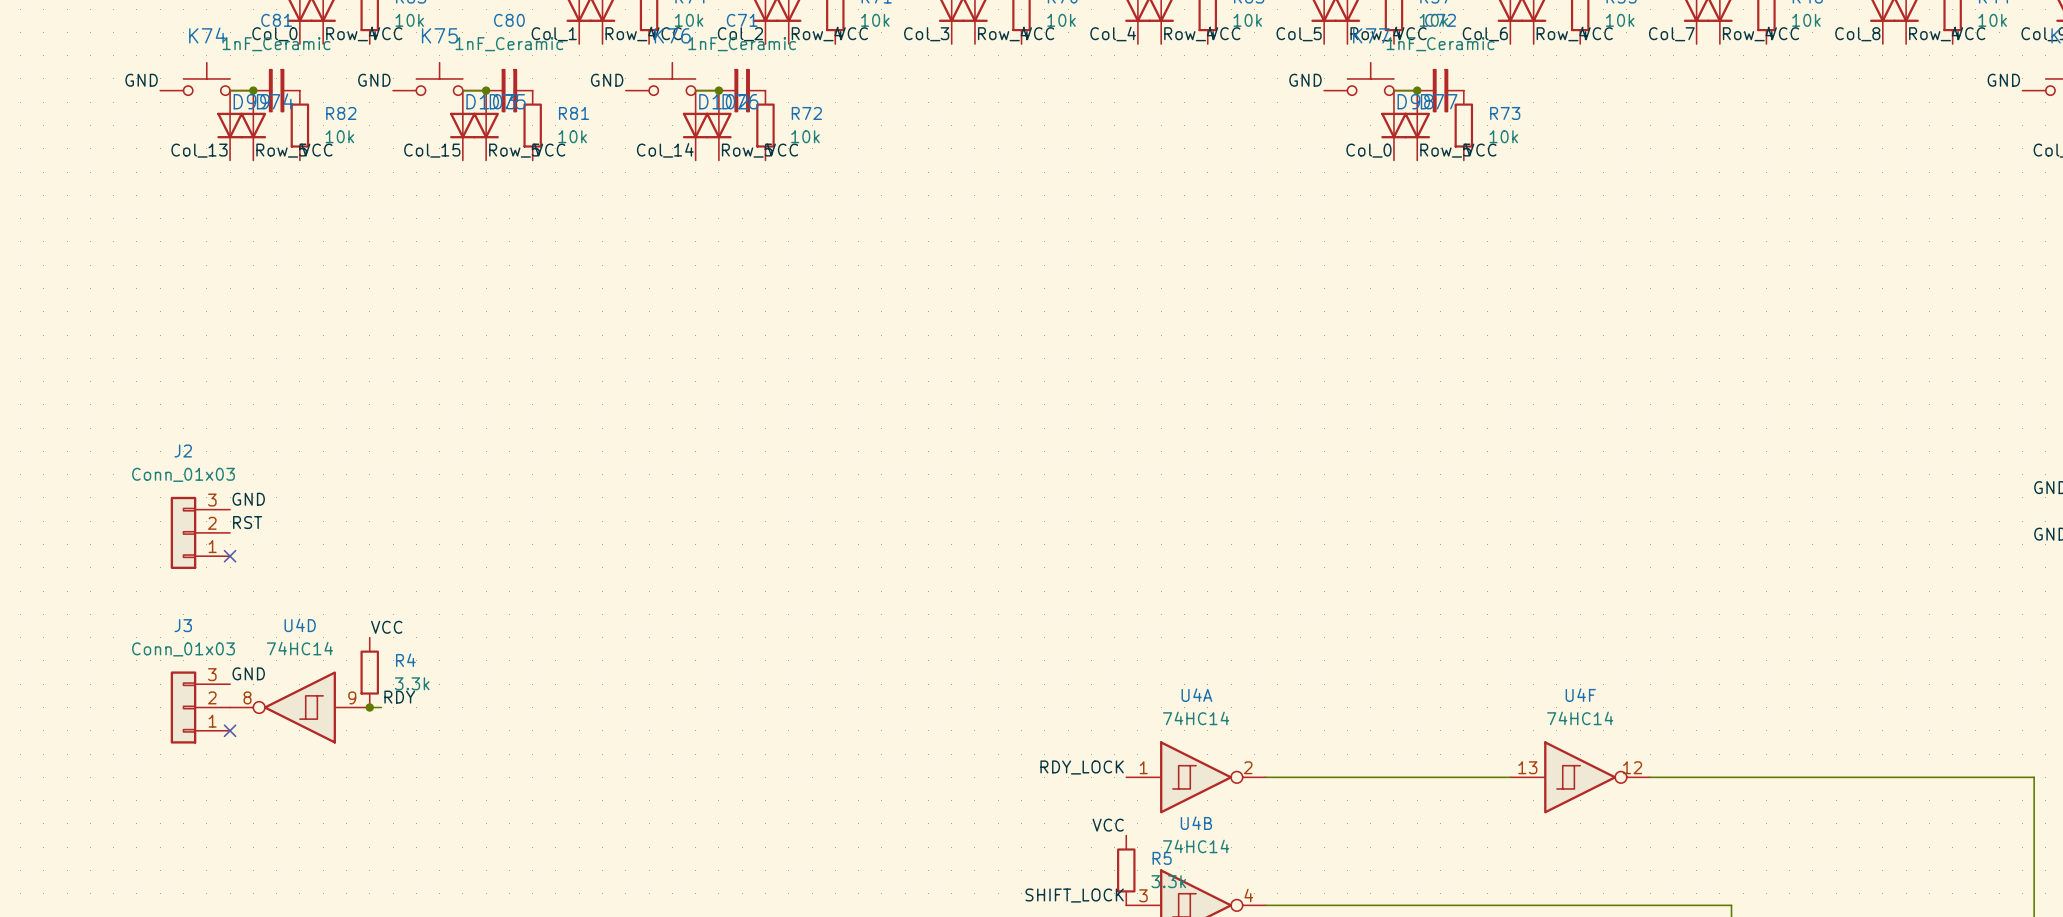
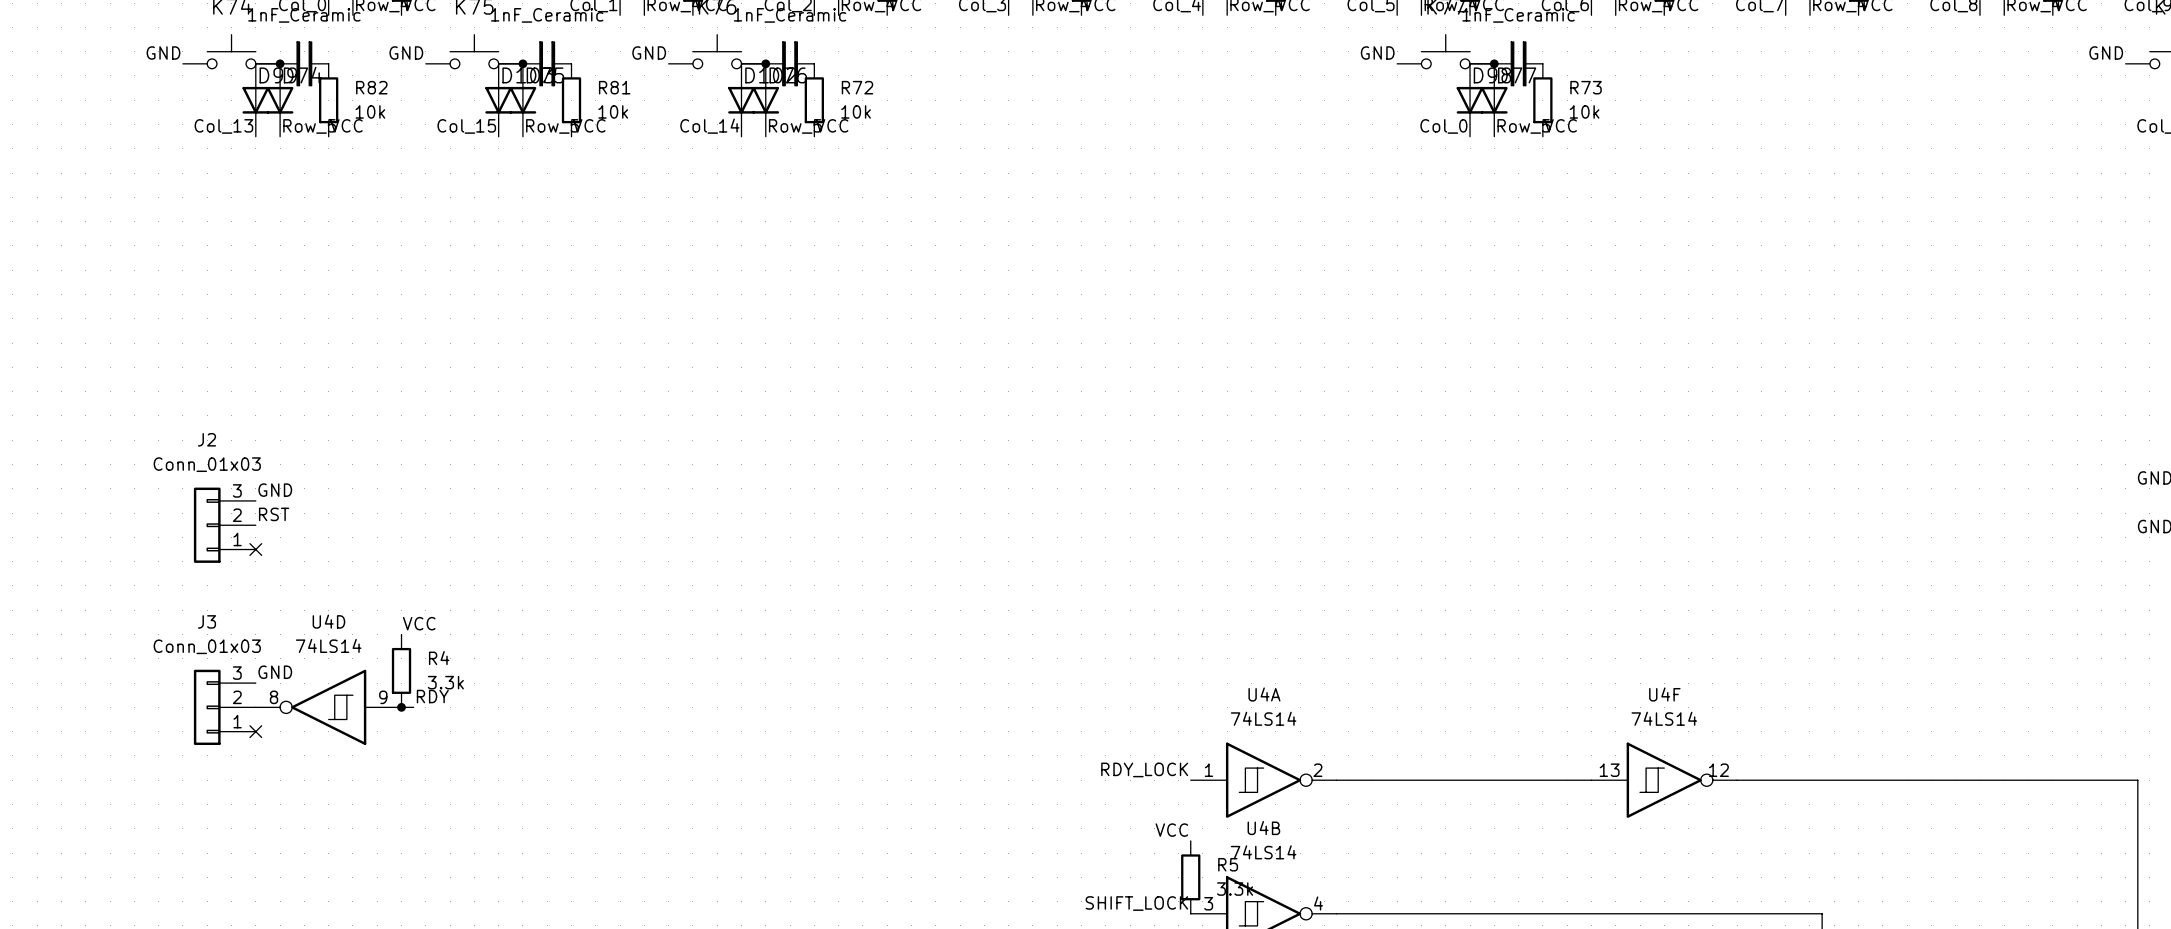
U4D value: 74HC14 (299, 648) -> 74LS14 (328, 645)
U4A value: 74HC14 (1196, 718) -> 74LS14 (1263, 718)
U4F value: 74HC14 (1580, 718) -> 74LS14 (1664, 718)
U4B value: 74HC14 (1196, 846) -> 74LS14 (1263, 852)

